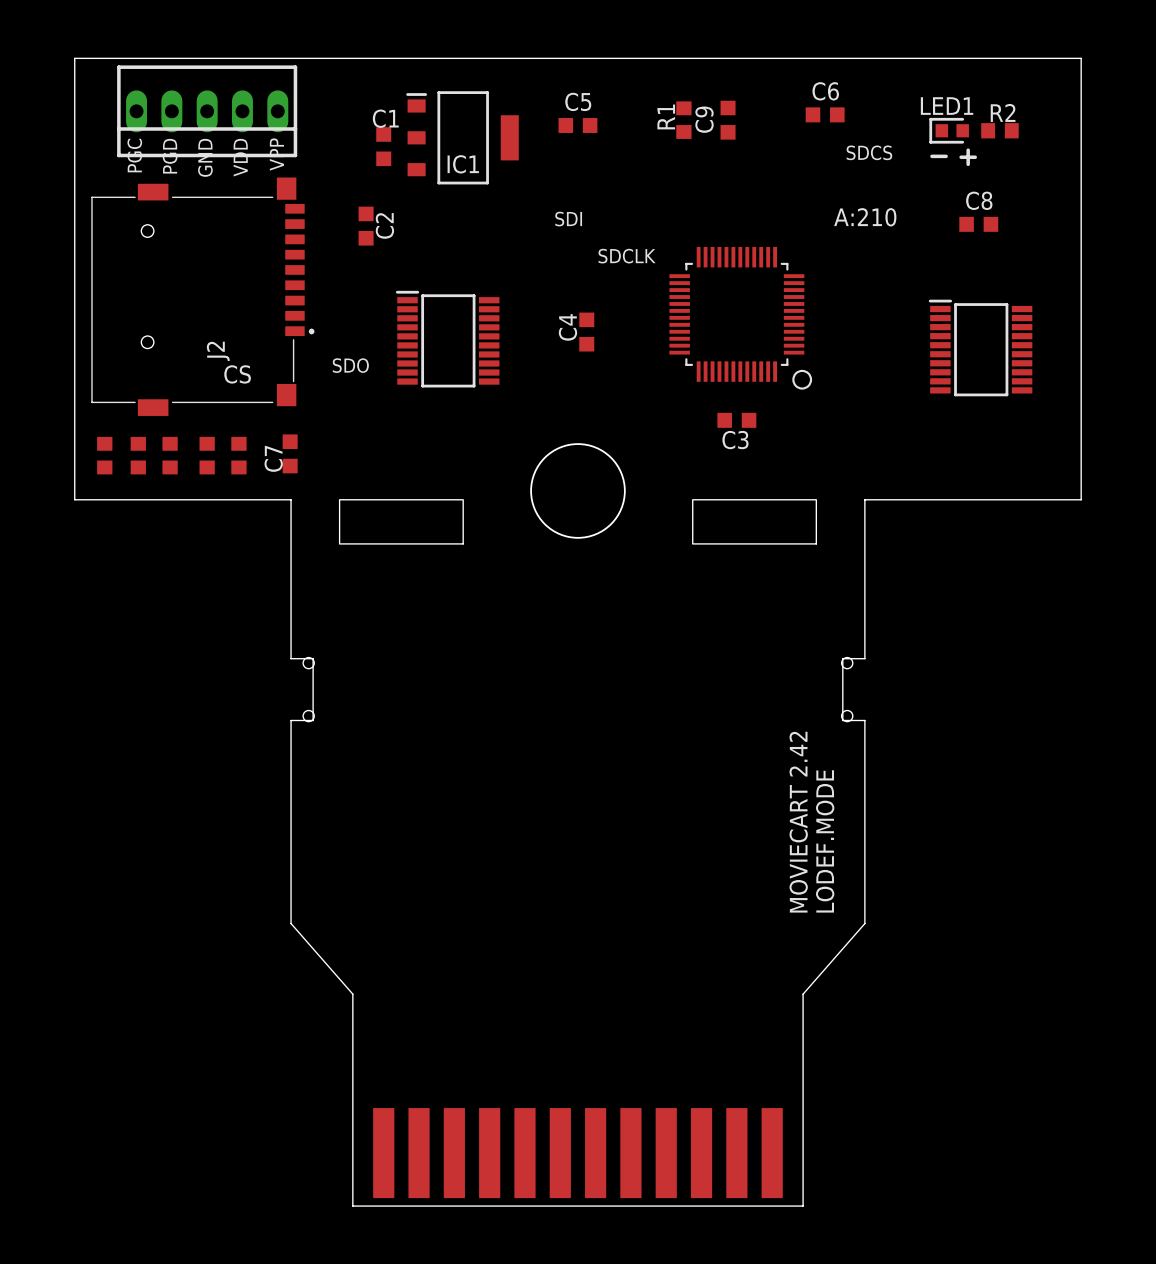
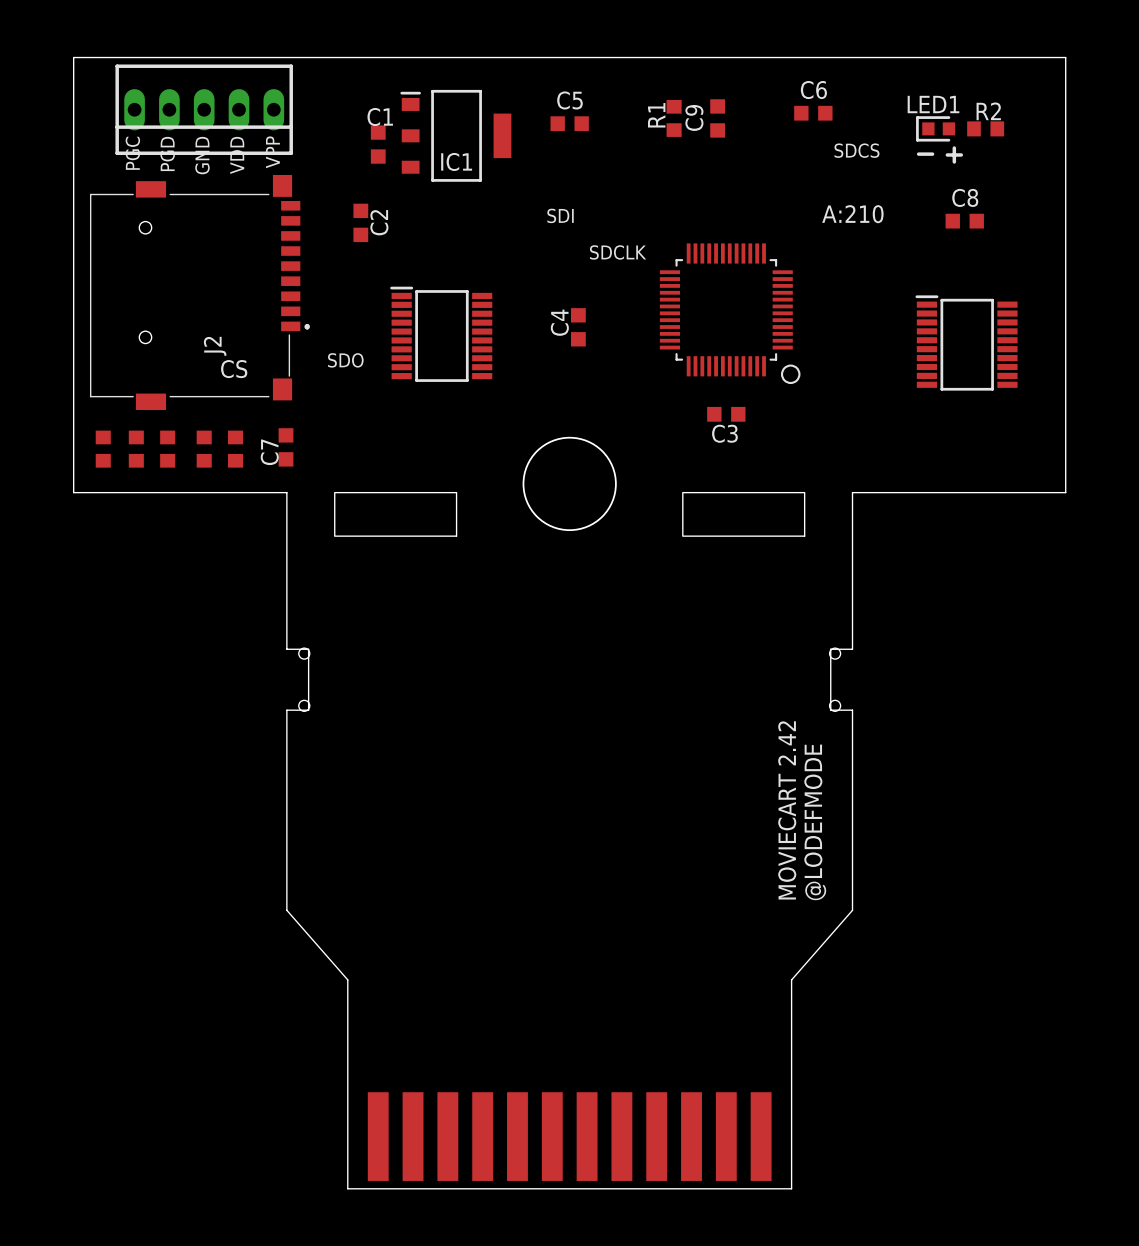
text: LODEF.MODE (825, 841) -> @LODEFMODE (815, 822)

